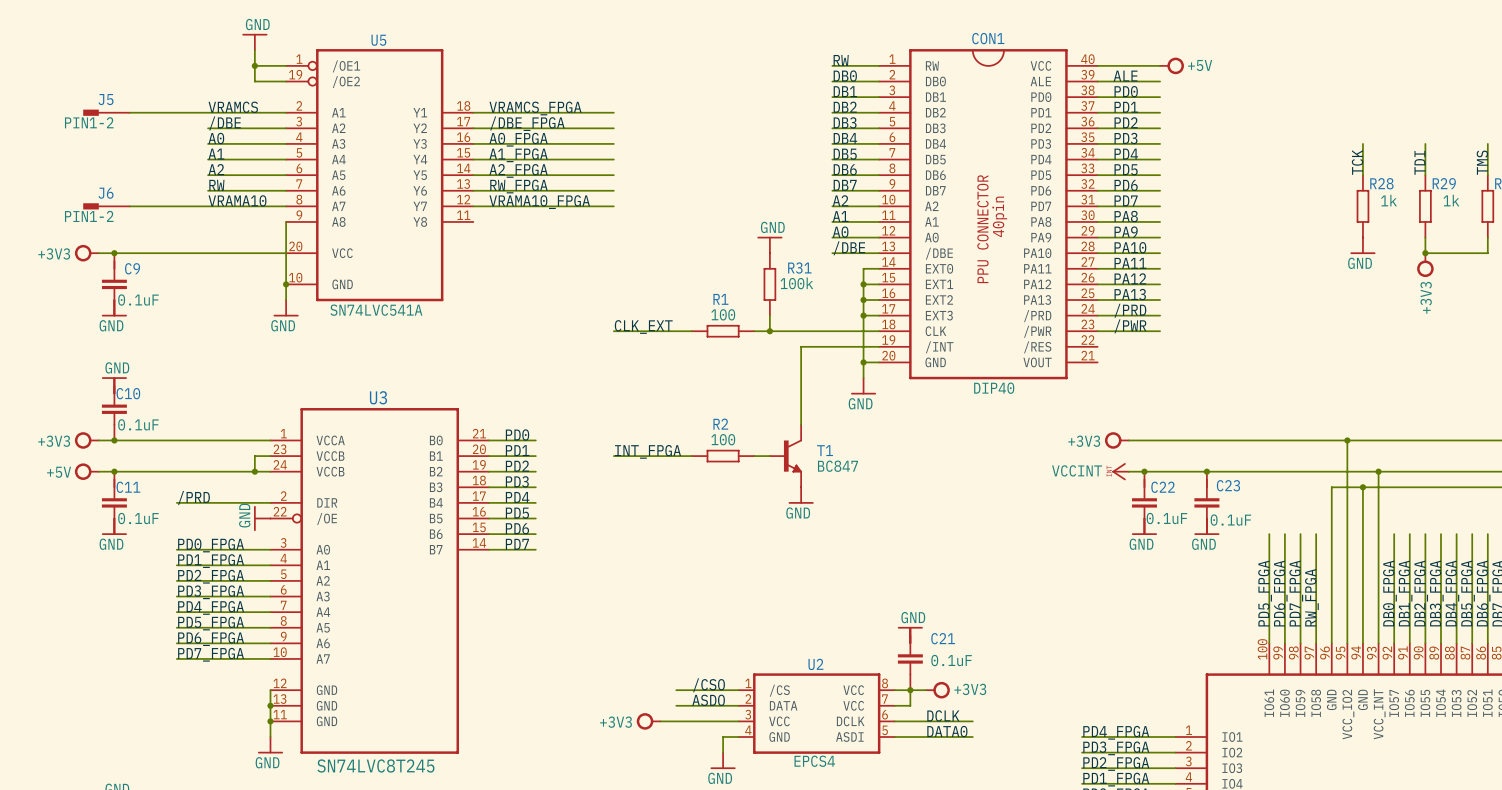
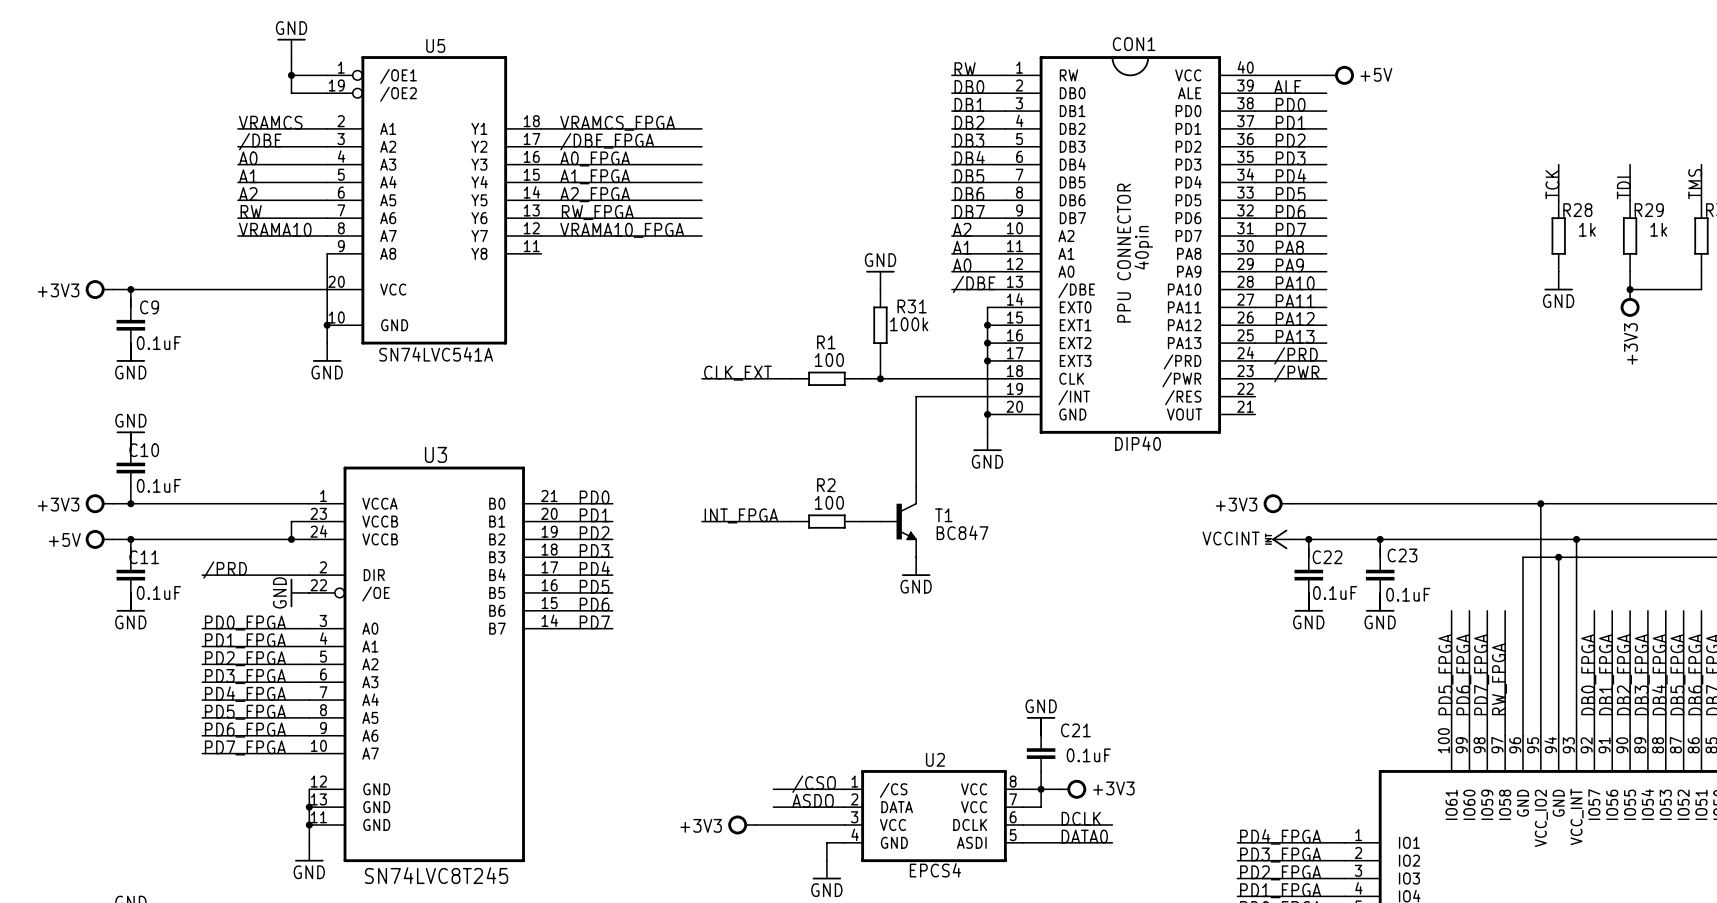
J5: PIN1-2 (106, 112) -> none
wire: (130, 112) (208, 112) -> none
J6: PIN1-2 (106, 206) -> none
wire: (130, 206) (208, 206) -> none

